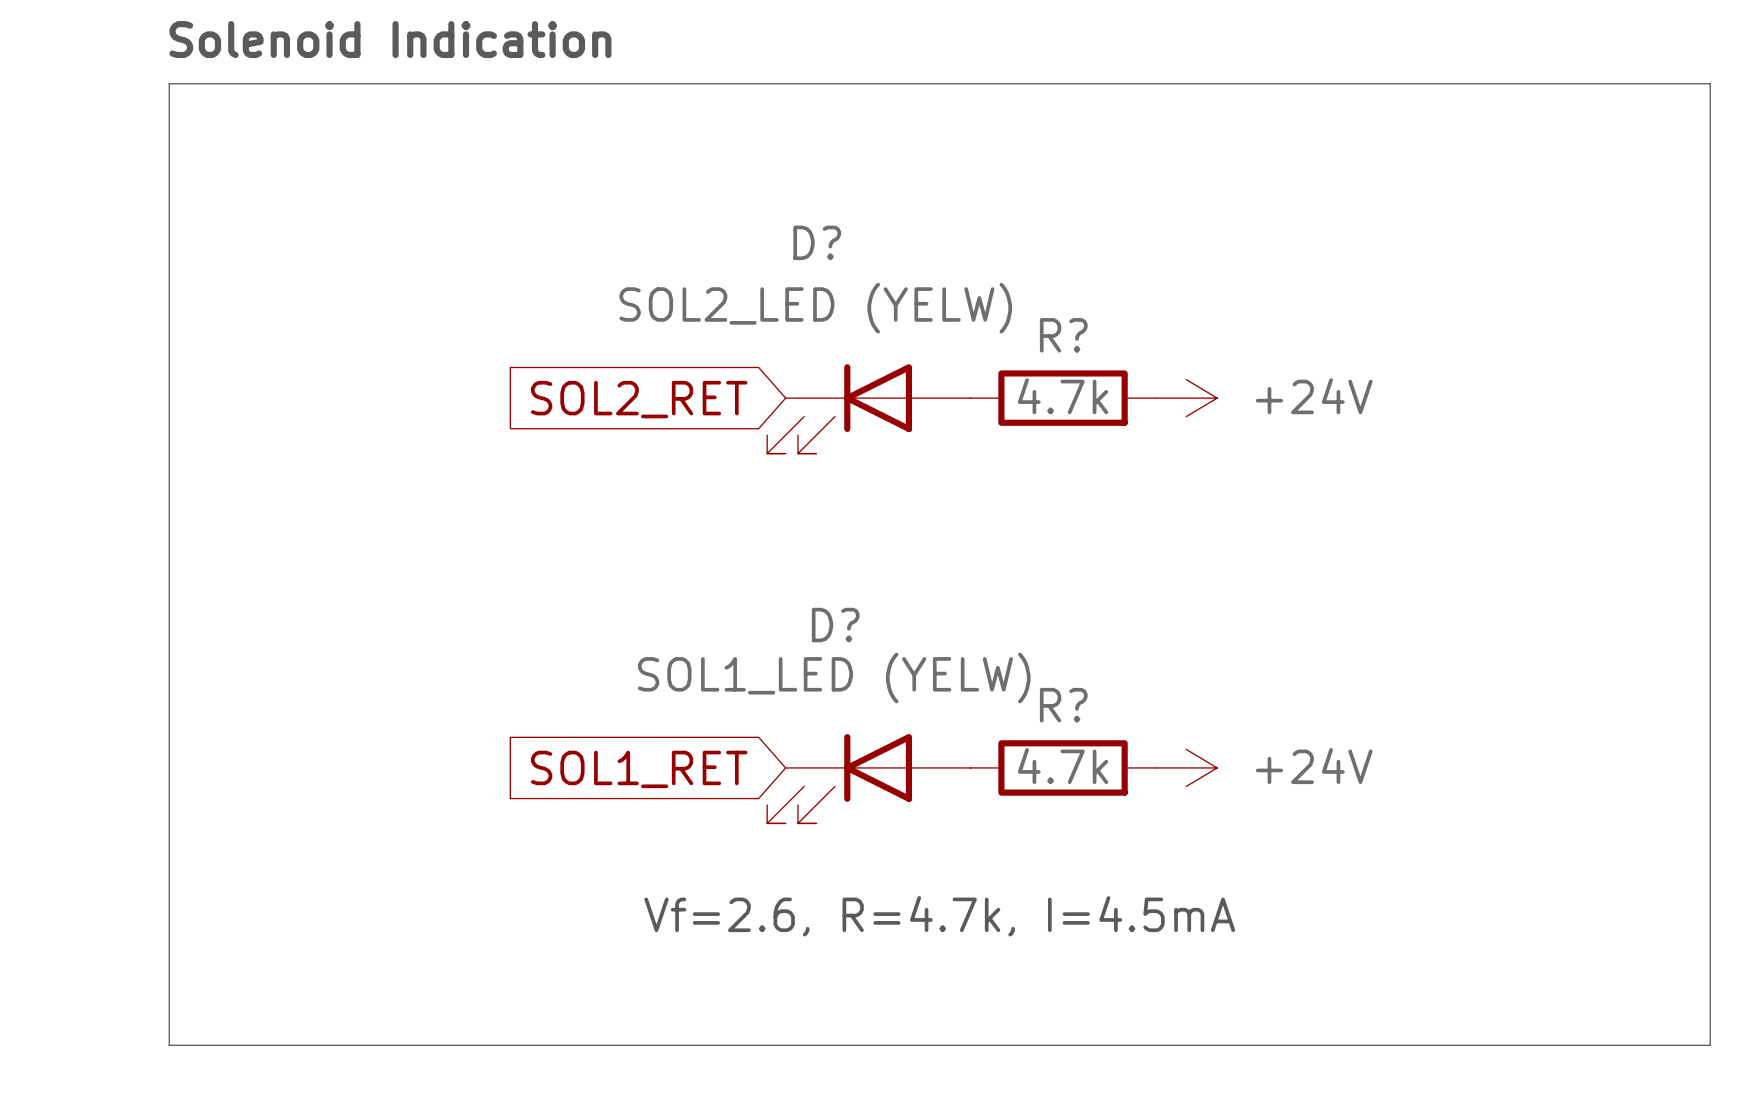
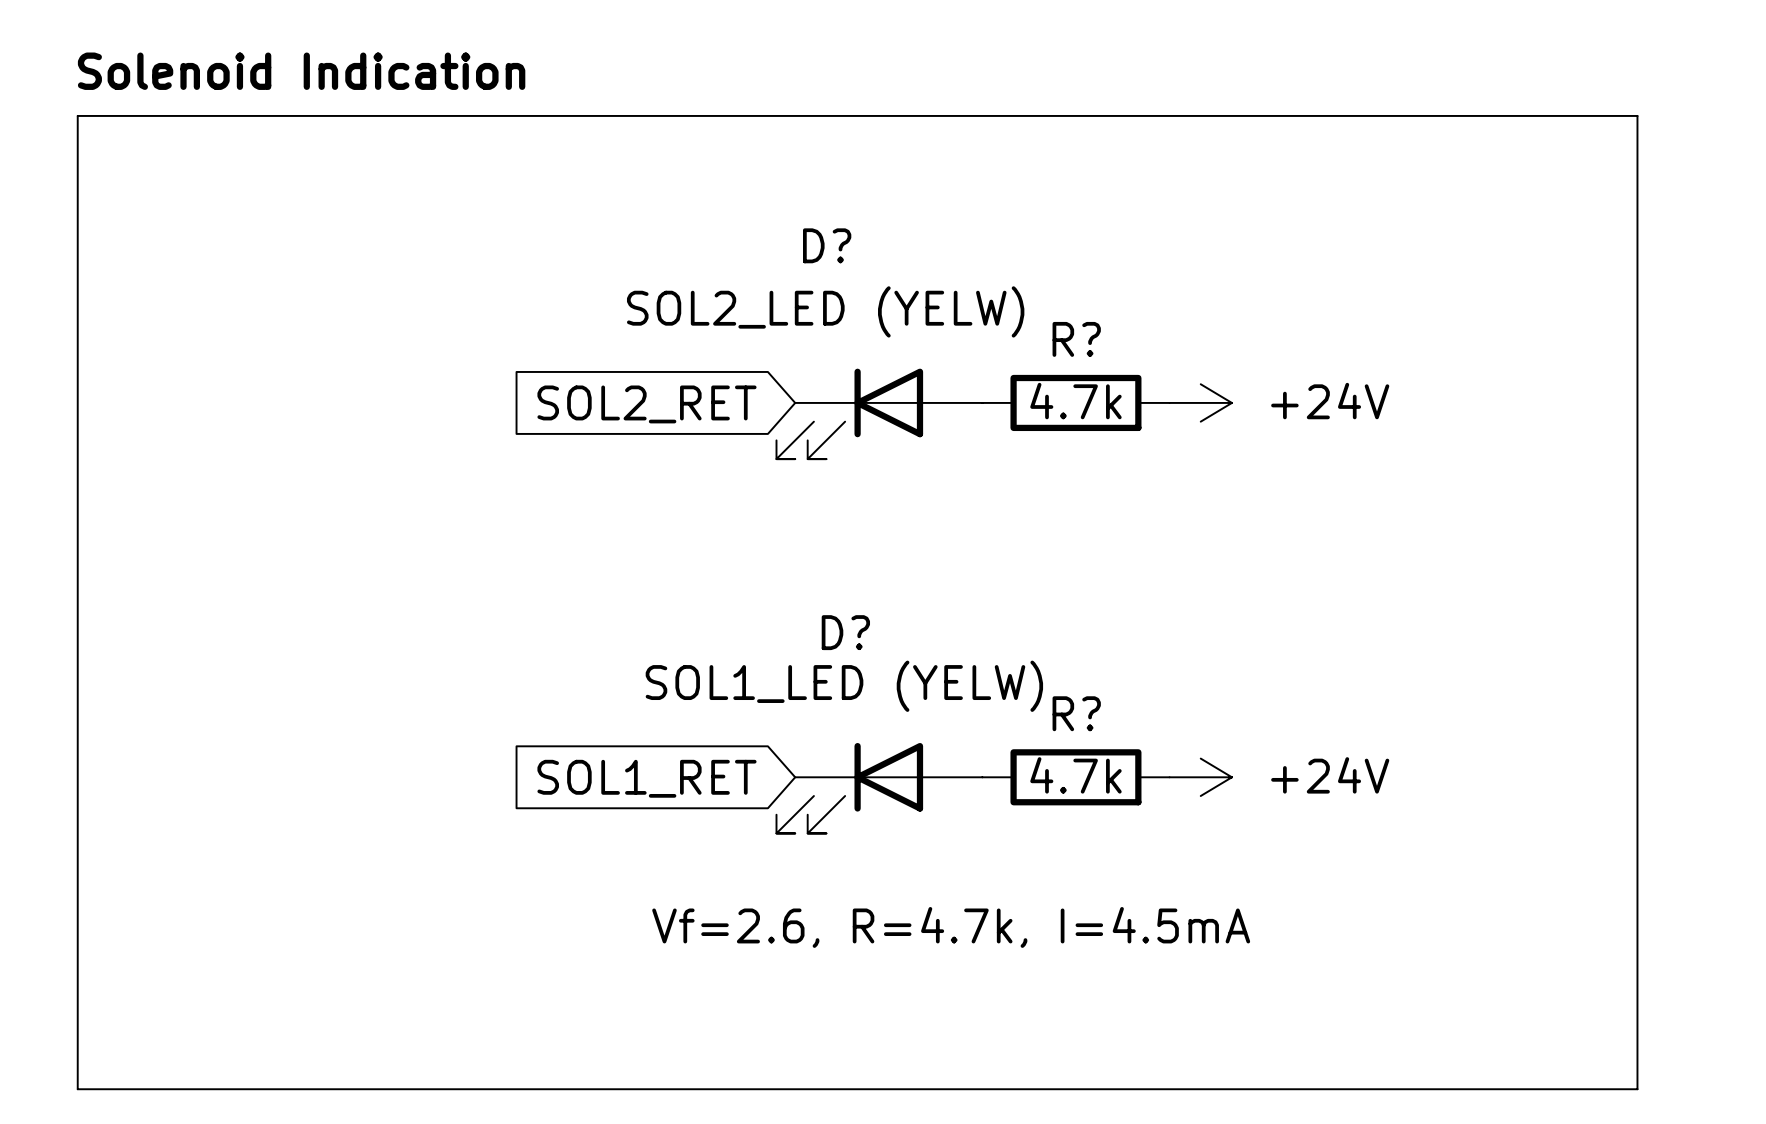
text position: Solenoid Indication (390, 39) -> Solenoid Indication (301, 71)
line: (169, 83) (1710, 83) (1710, 1045) (169, 1045) (169, 83) -> (77, 115) (77, 1089) (1637, 1089) (1637, 115) (77, 115)

